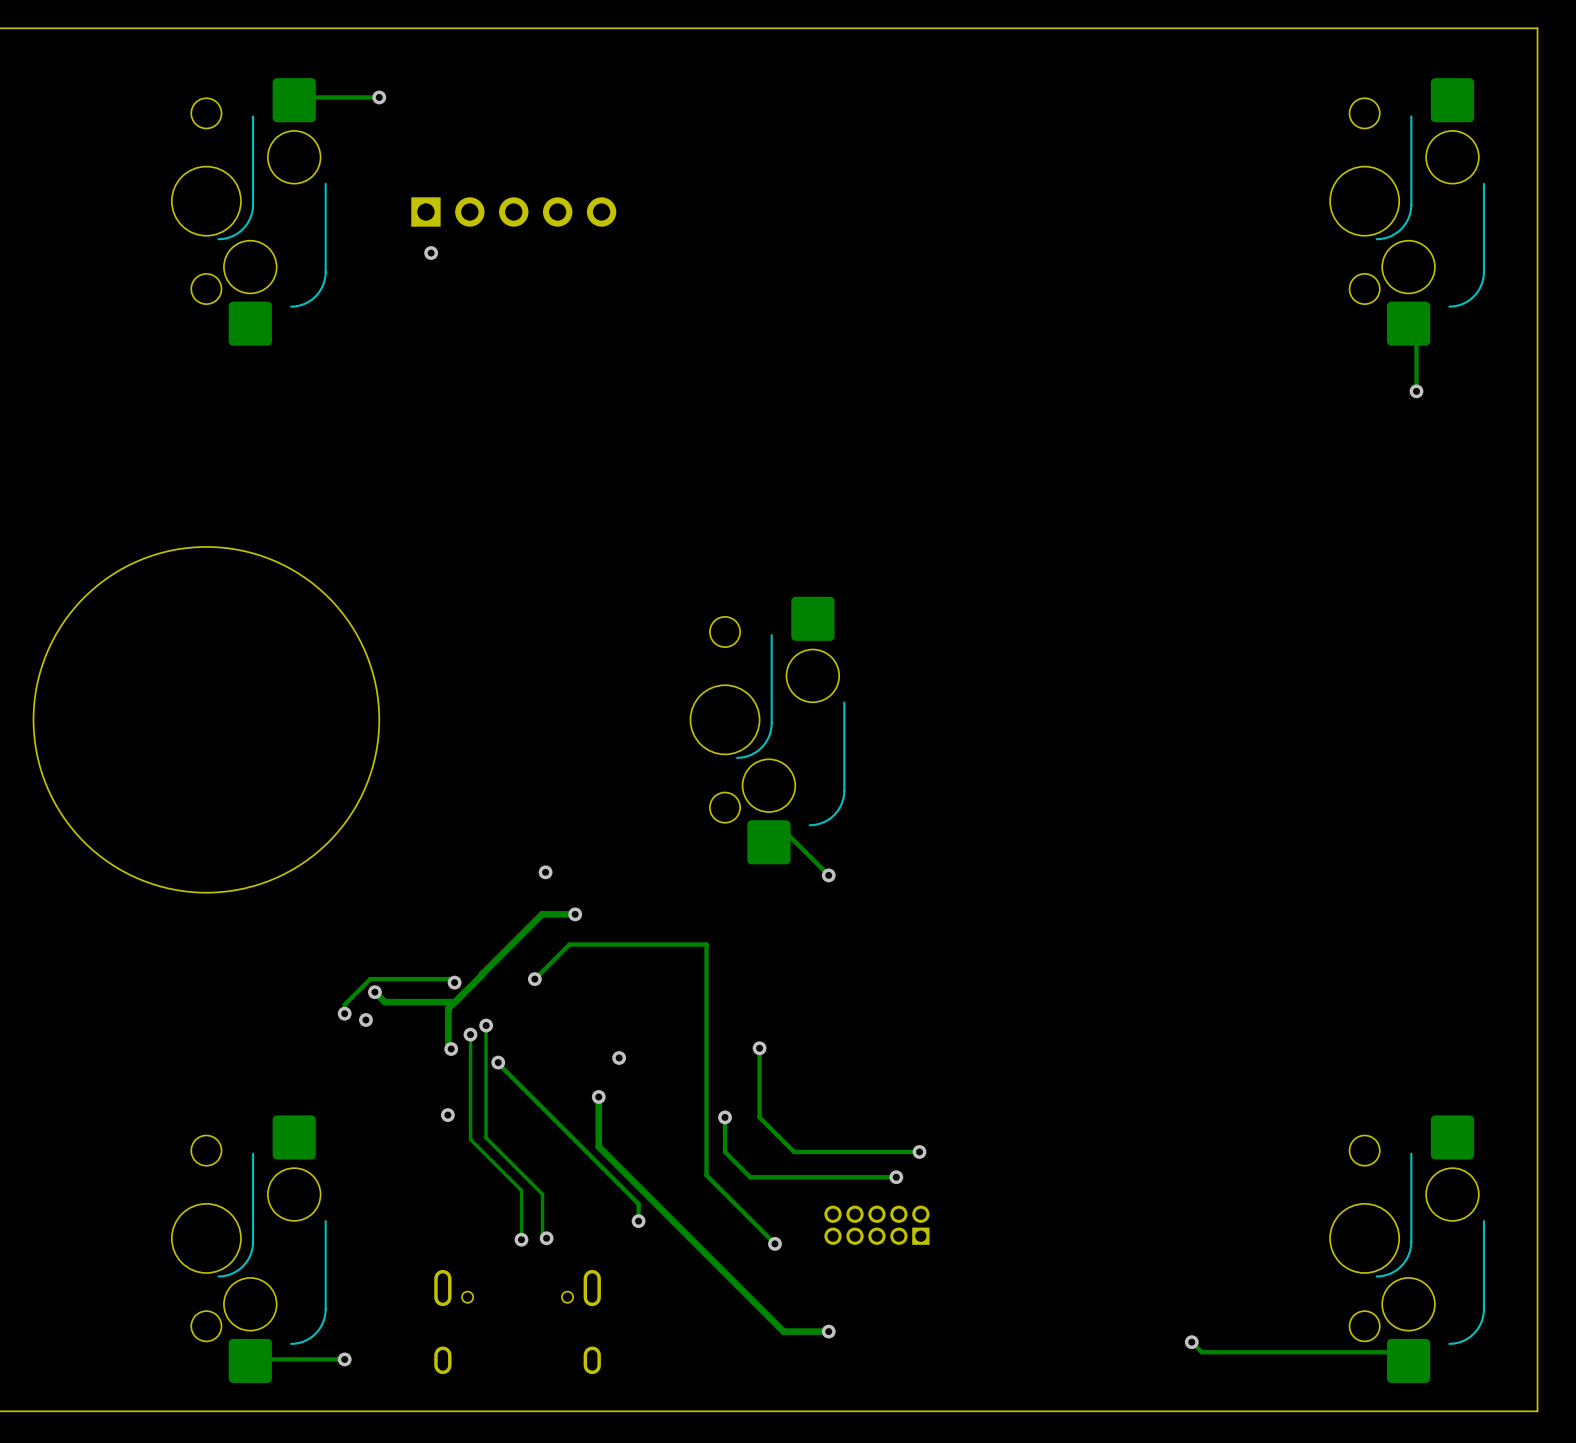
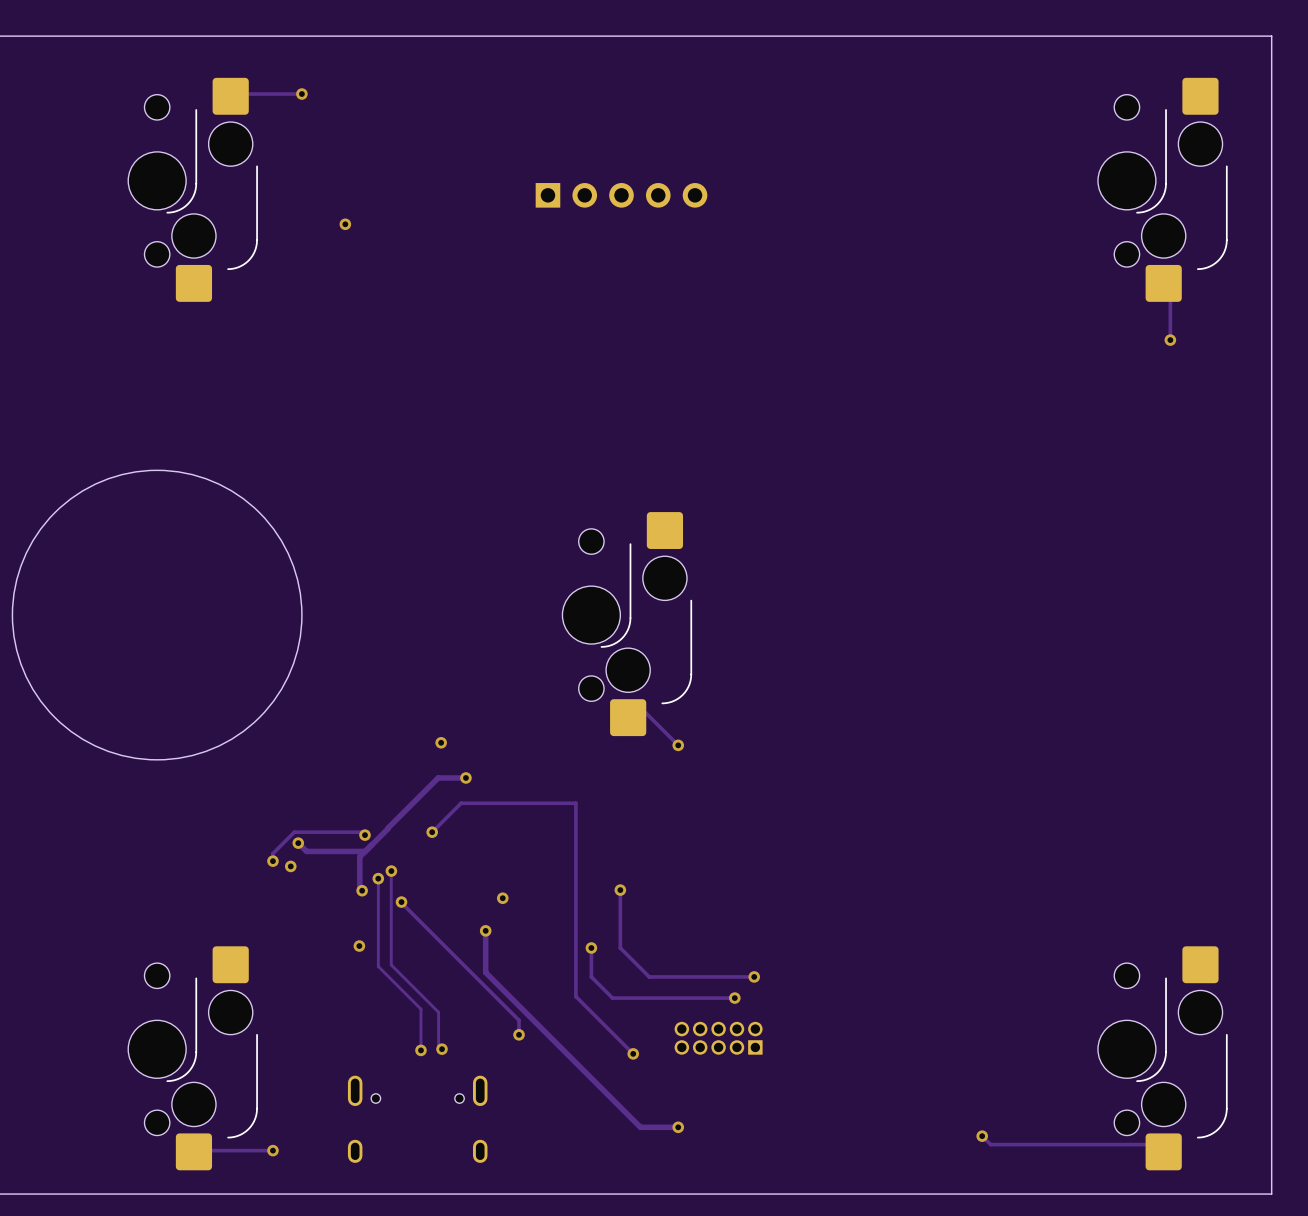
part position: (513, 212) -> (621, 195)

